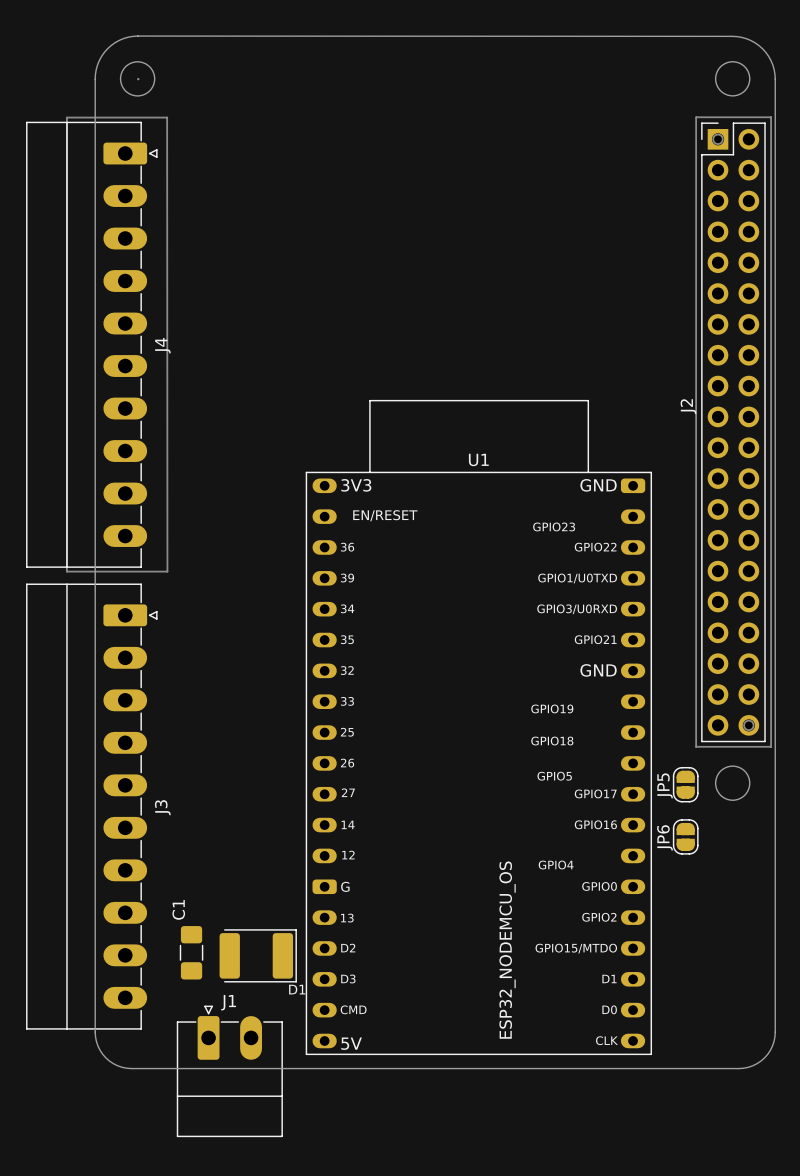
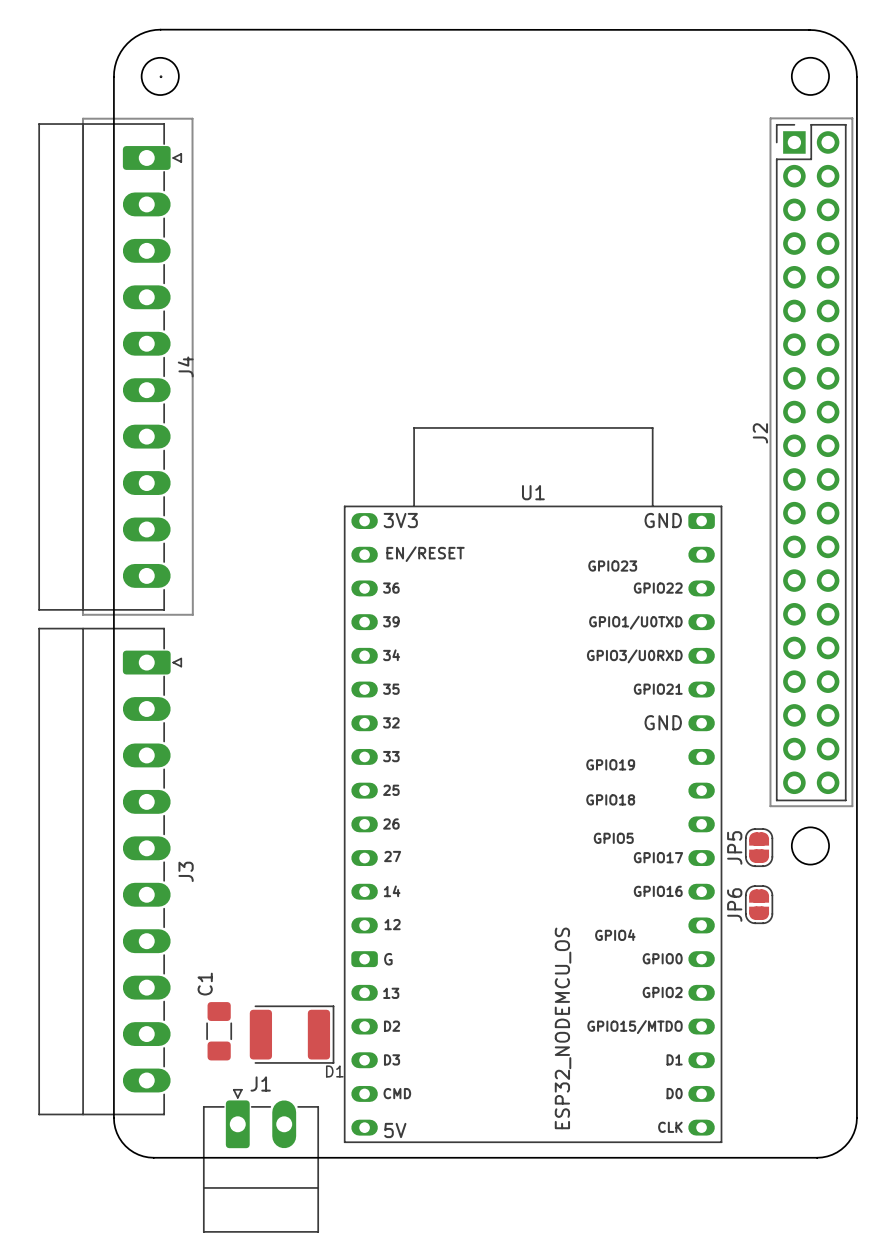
drawing: [712, 133, 724, 145] -> none
drawing: [743, 719, 755, 732] -> none

